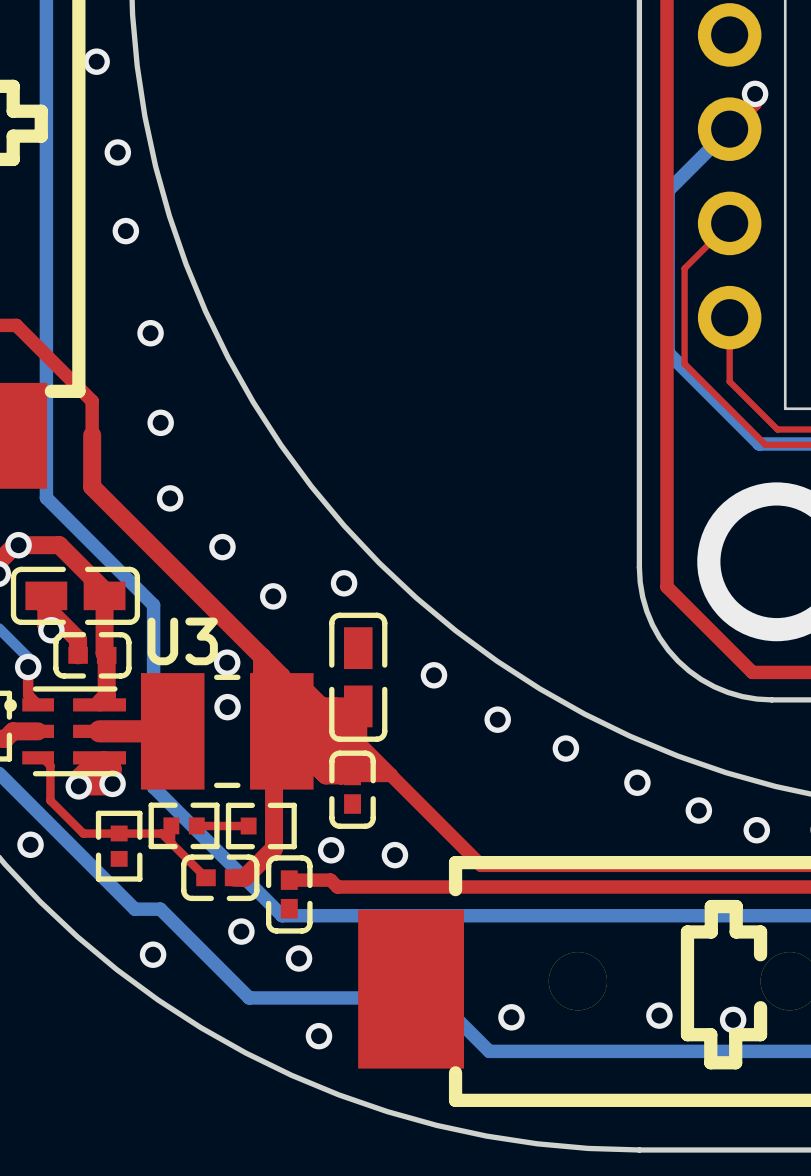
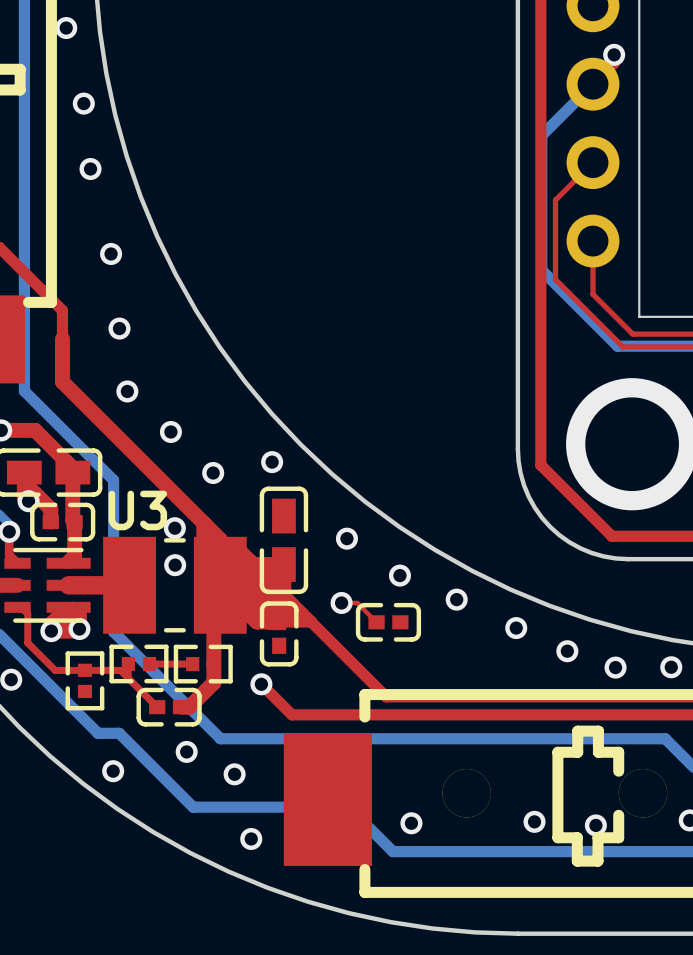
top track: none -> (341, 602) (357, 602) (376, 622)
via position: (394, 855) -> (341, 602)
top track: (289, 880) (330, 880) (337, 886) (367, 886) -> (261, 684) (291, 714)
part rotation: 0° (289, 894) -> 90° clockwise (388, 622)
part position: (289, 894) -> (388, 622)

